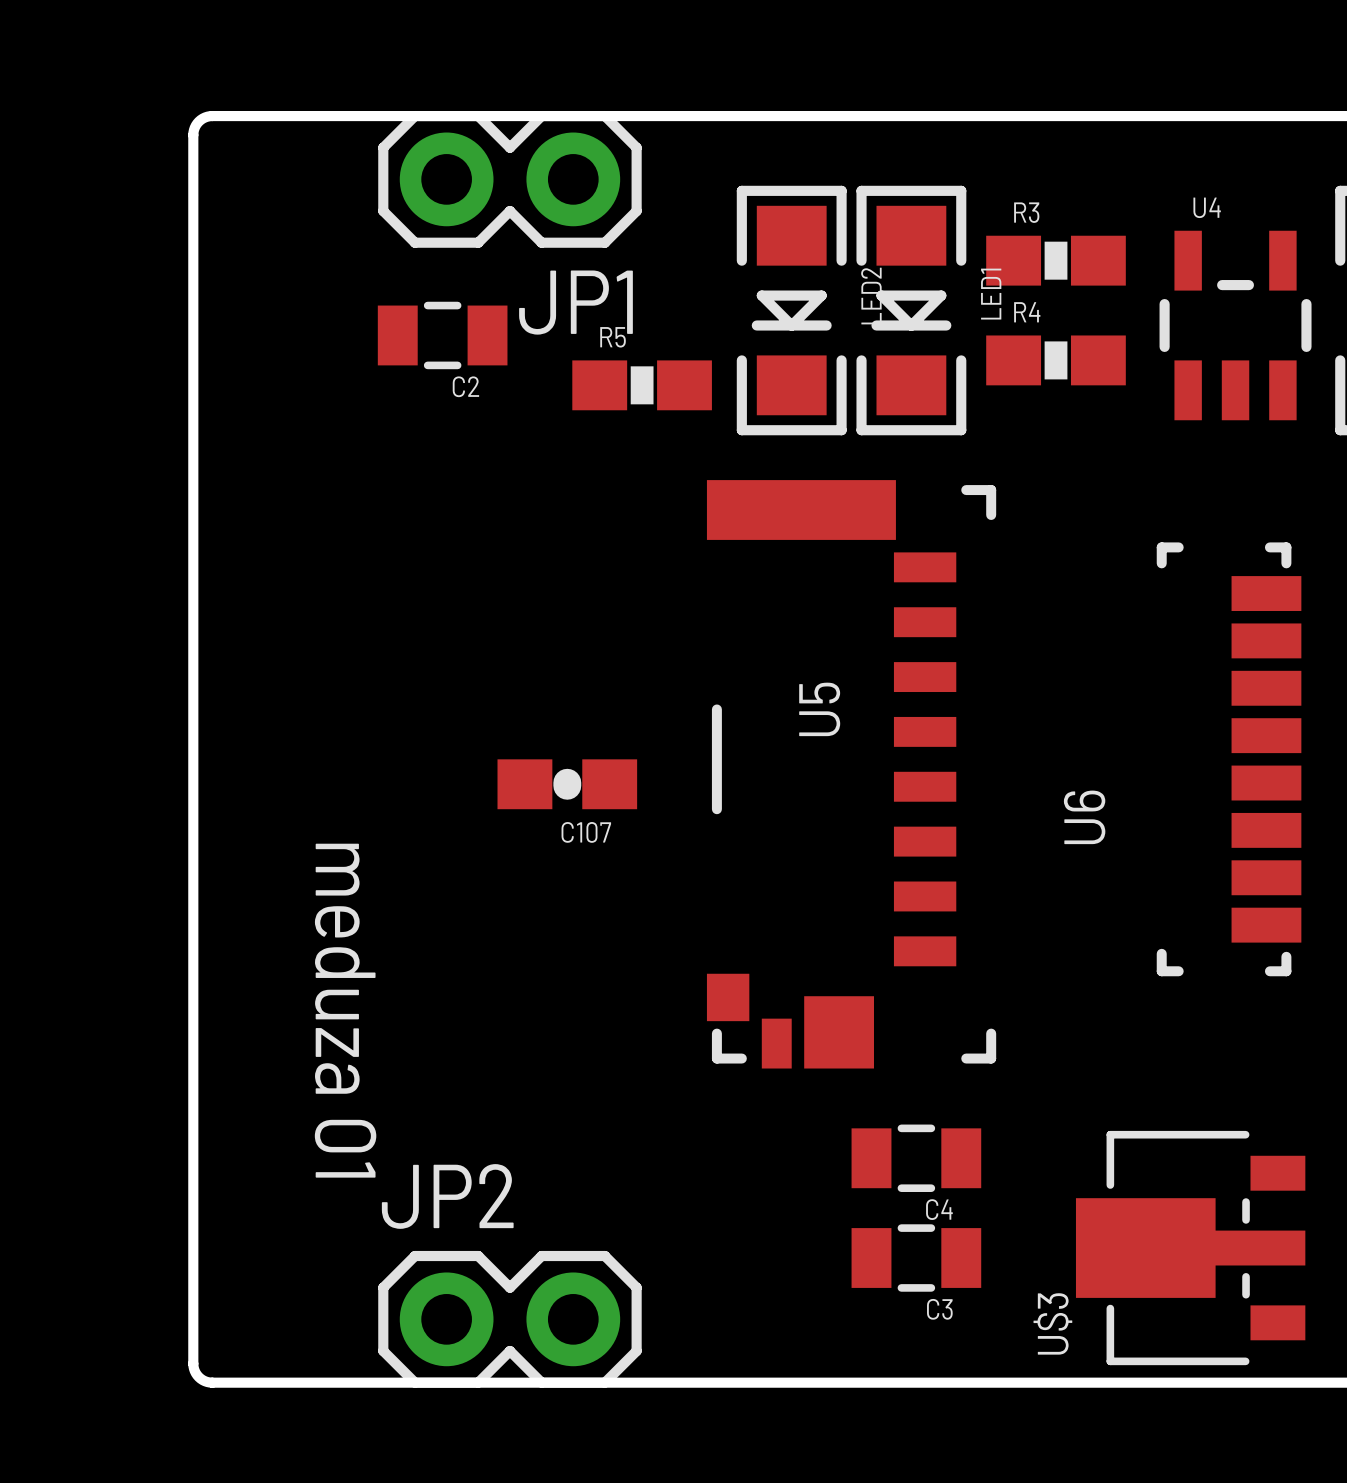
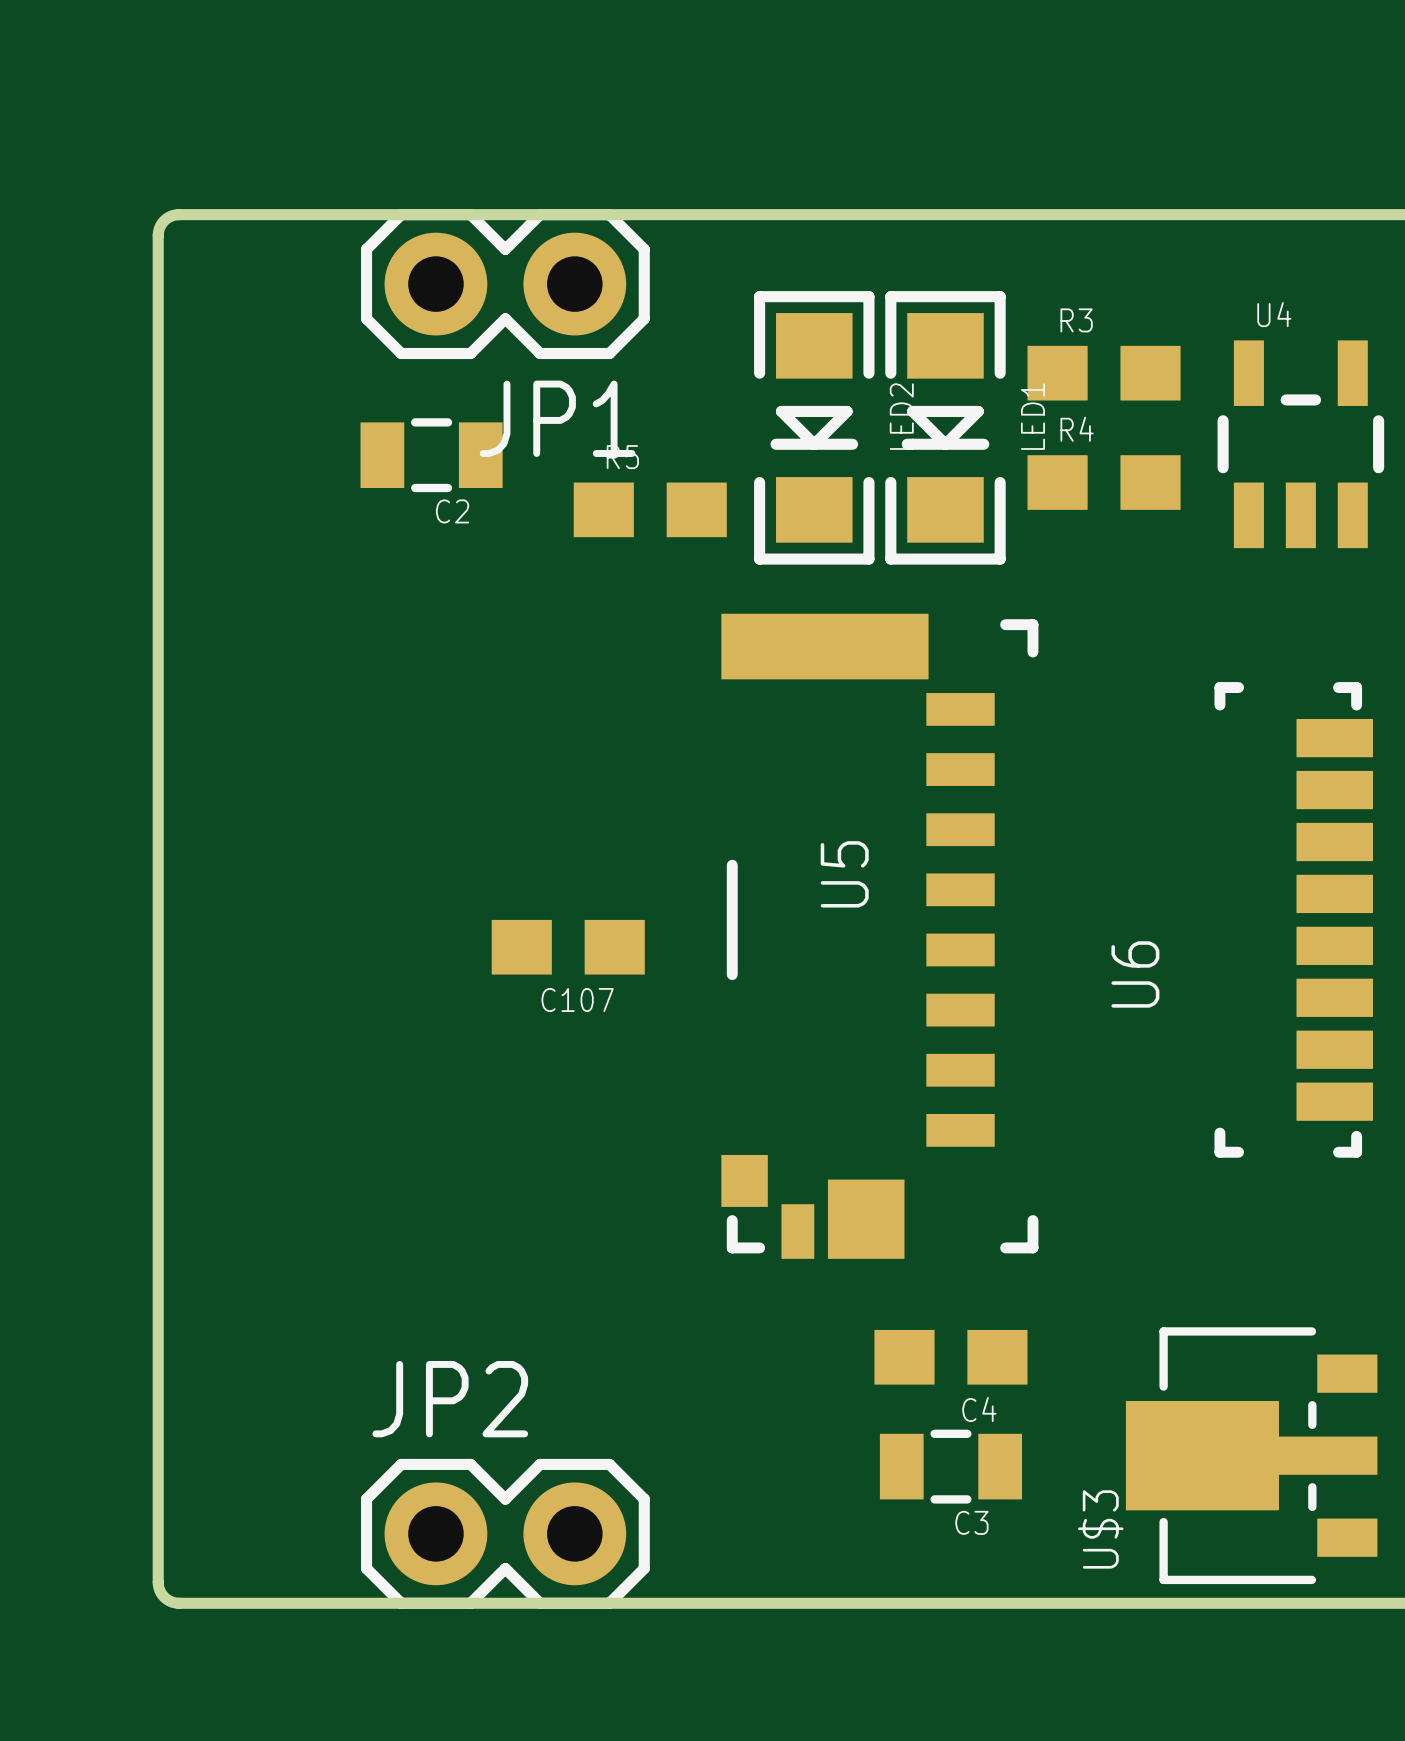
R3 footprint: [986, 235, 1126, 286] -> [1027, 345, 1181, 401]
R4 footprint: [986, 335, 1126, 386] -> [1027, 455, 1181, 510]
R5 footprint: [572, 360, 712, 411] -> [573, 482, 727, 538]
C107 footprint: [497, 759, 638, 810] -> [491, 919, 645, 975]
text: meduza 01 (345, 1010) -> none
C4 footprint: [851, 1124, 982, 1192] -> [874, 1329, 1028, 1385]

